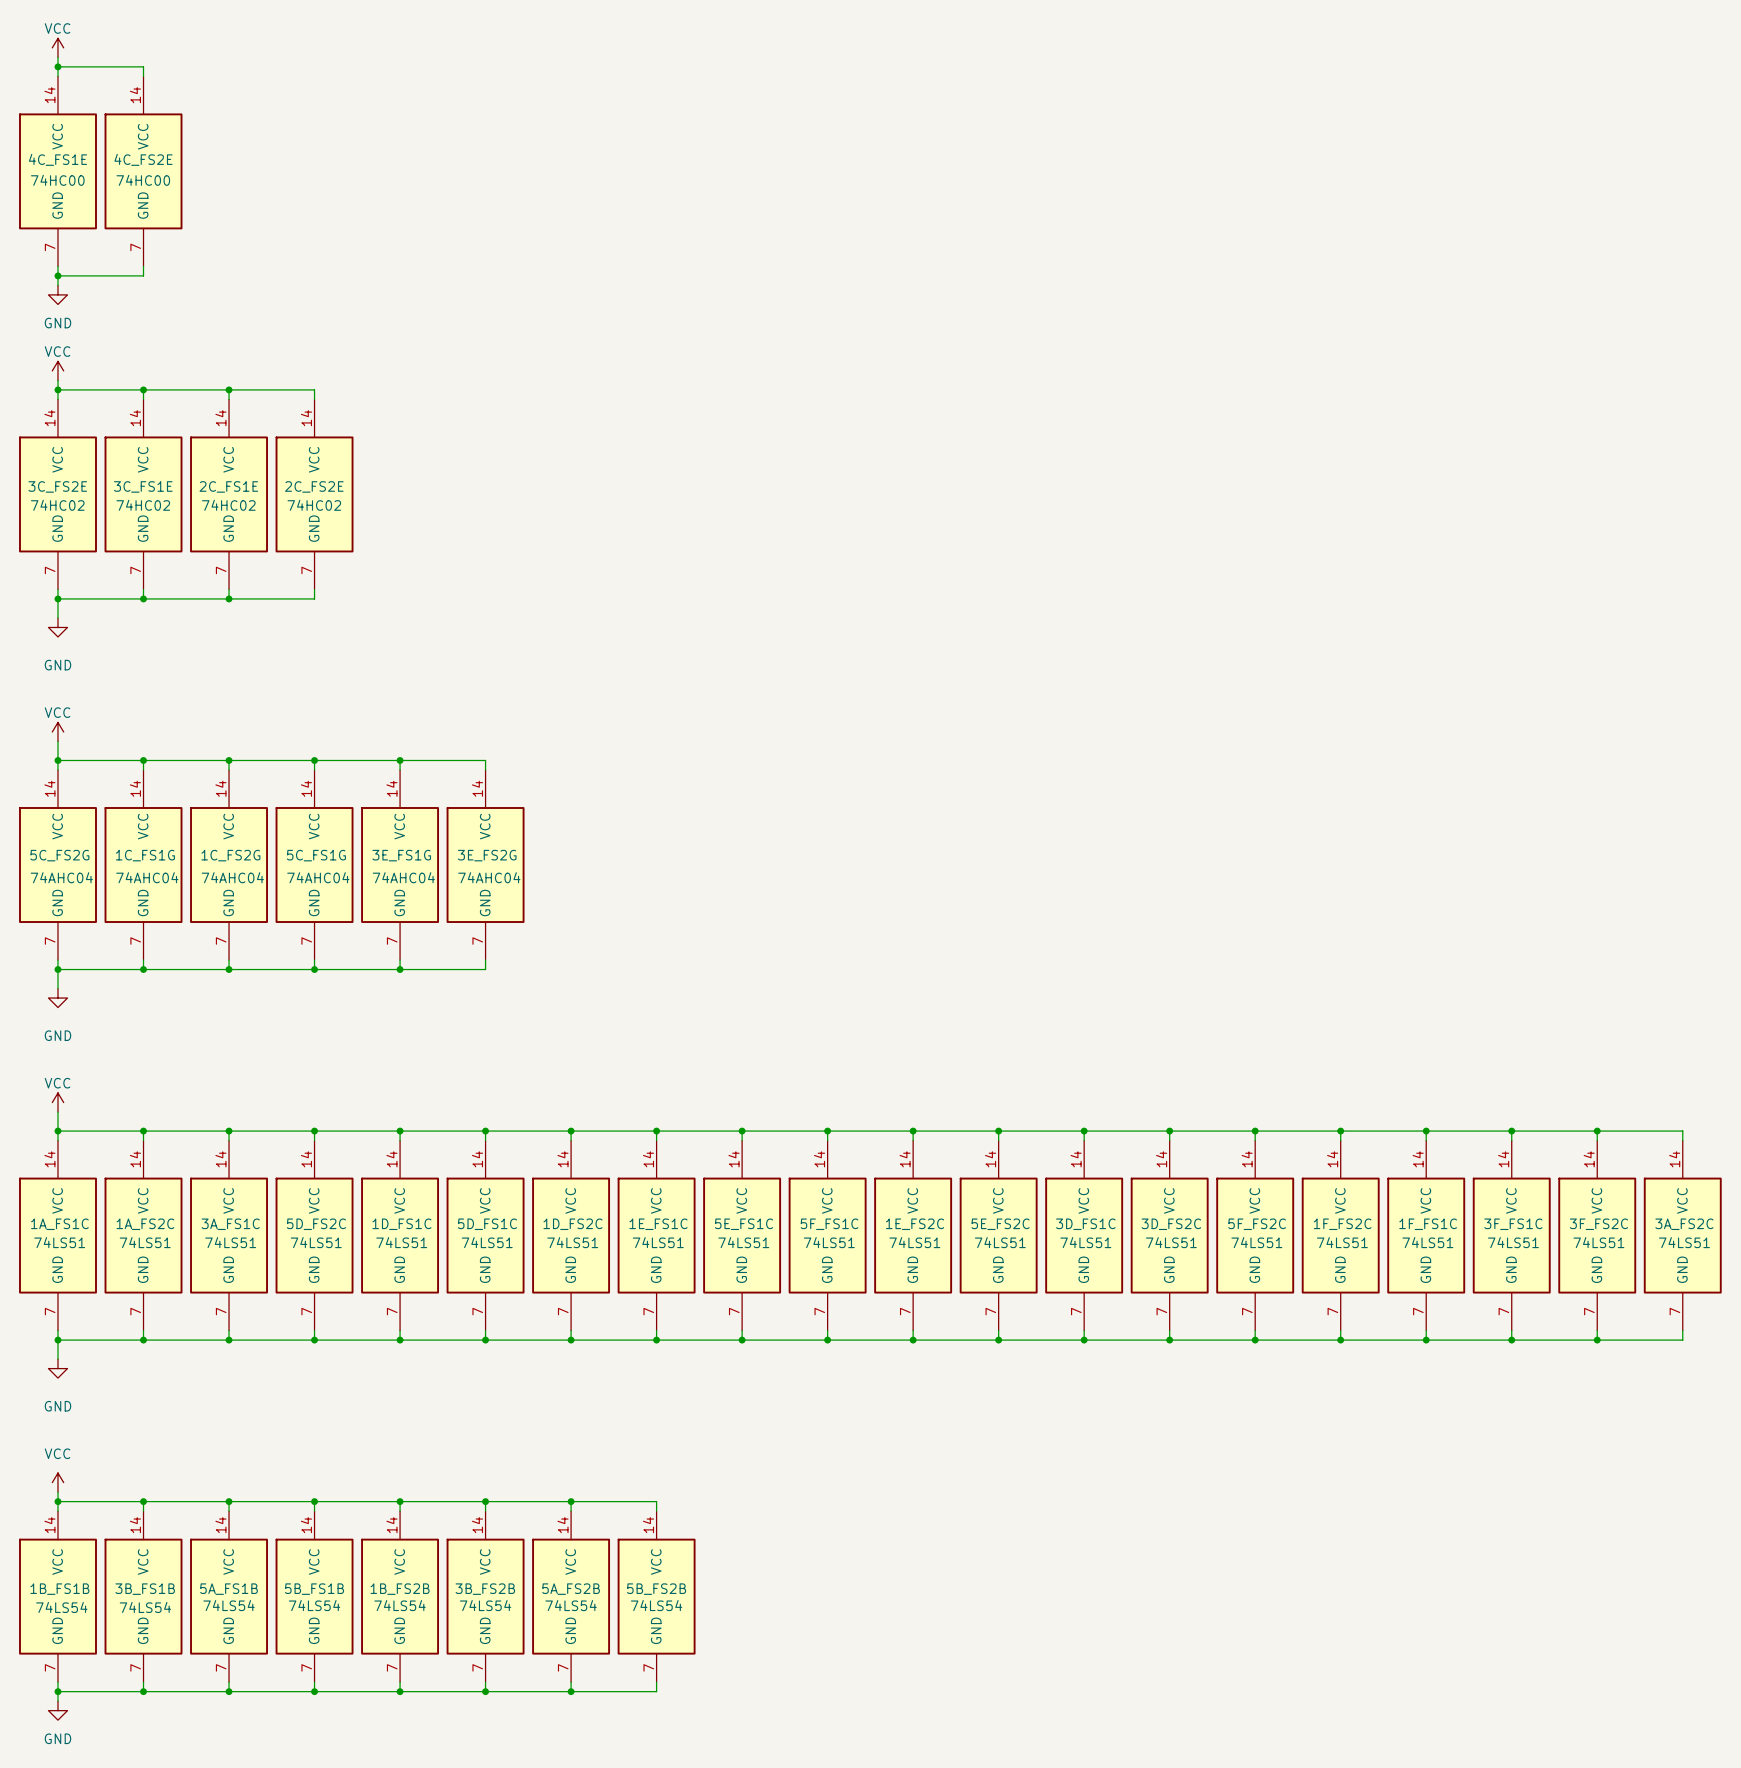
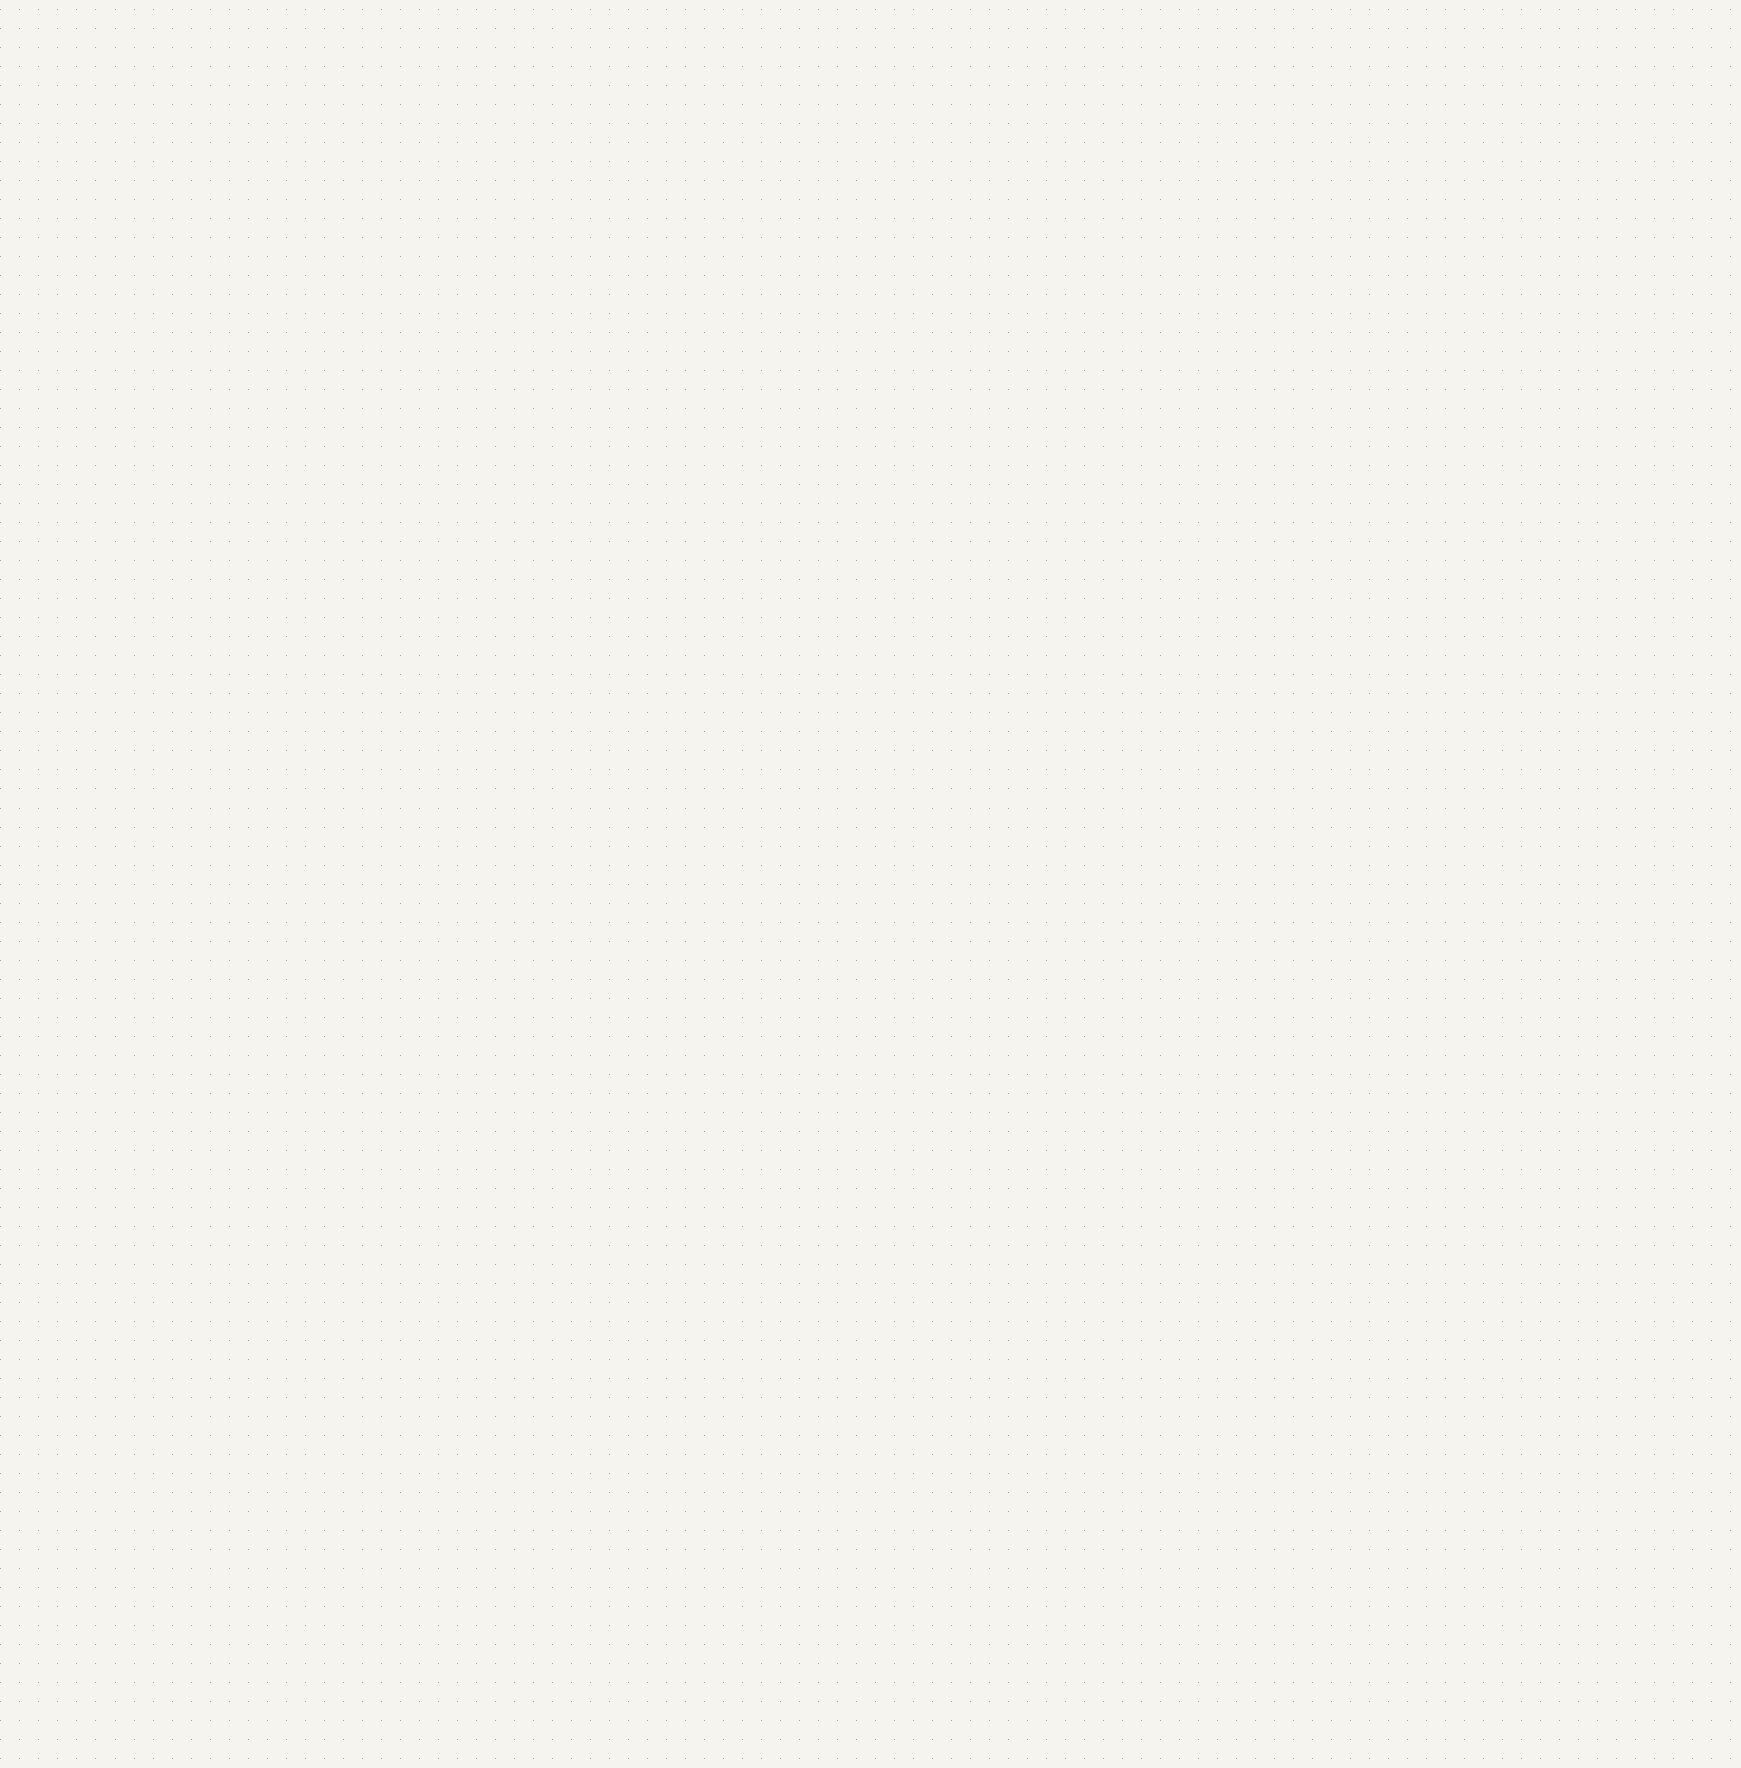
power symbol: VCC (57, 47) -> none
wire: (57, 57) (57, 76) -> none
wire: (57, 66) (143, 66) (143, 76) -> none
junction: (57, 66) -> none
4C_FS1E: 74HC00 (57, 171) -> none
4C_FS2E: 74HC00 (143, 171) -> none
wire: (57, 266) (57, 285) -> none
wire: (143, 266) (143, 275) (57, 275) -> none
junction: (57, 275) -> none
power symbol: GND (57, 294) -> none
power symbol: VCC (57, 370) -> none
wire: (57, 380) (57, 399) -> none
wire: (57, 389) (314, 389) (314, 399) -> none
junction: (57, 389) -> none
wire: (143, 389) (143, 399) -> none
junction: (143, 389) -> none
wire: (229, 389) (229, 399) -> none
junction: (229, 389) -> none
3C_FS2E: 74HC02 (57, 494) -> none
3C_FS1E: 74HC02 (143, 494) -> none
2C_FS1E: 74HC02 (229, 494) -> none
2C_FS2E: 74HC02 (314, 494) -> none
wire: (57, 589) (57, 617) -> none
wire: (143, 589) (143, 598) -> none
wire: (229, 589) (229, 598) -> none
wire: (314, 589) (314, 598) (57, 598) -> none
junction: (57, 598) -> none
junction: (143, 598) -> none
junction: (229, 598) -> none
power symbol: GND (57, 627) -> none
power symbol: VCC (57, 731) -> none
wire: (57, 741) (57, 769) -> none
wire: (57, 760) (485, 760) (485, 769) -> none
junction: (57, 760) -> none
wire: (143, 760) (143, 769) -> none
junction: (143, 760) -> none
wire: (229, 760) (229, 769) -> none
junction: (229, 760) -> none
wire: (314, 760) (314, 769) -> none
junction: (314, 760) -> none
wire: (400, 760) (400, 769) -> none
junction: (400, 760) -> none
5C_FS2G: 74AHC04 (57, 865) -> none
1C_FS1G: 74AHC04 (143, 865) -> none
1C_FS2G: 74AHC04 (229, 865) -> none
5C_FS1G: 74AHC04 (314, 865) -> none
3E_FS1G: 74AHC04 (400, 865) -> none
3E_FS2G: 74AHC04 (485, 865) -> none
wire: (57, 960) (57, 988) -> none
wire: (143, 960) (143, 969) -> none
wire: (229, 960) (229, 969) -> none
wire: (314, 960) (314, 969) -> none
wire: (400, 960) (400, 969) -> none
wire: (485, 960) (485, 969) (57, 969) -> none
junction: (57, 969) -> none
junction: (143, 969) -> none
junction: (229, 969) -> none
junction: (314, 969) -> none
junction: (400, 969) -> none
power symbol: GND (57, 998) -> none
power symbol: VCC (57, 1102) -> none
wire: (57, 1112) (57, 1140) -> none
wire: (57, 1131) (1682, 1131) (1682, 1140) -> none
junction: (57, 1131) -> none
wire: (143, 1131) (143, 1140) -> none
junction: (143, 1131) -> none
wire: (229, 1131) (229, 1140) -> none
junction: (229, 1131) -> none
wire: (314, 1131) (314, 1140) -> none
junction: (314, 1131) -> none
wire: (400, 1131) (400, 1140) -> none
junction: (400, 1131) -> none
wire: (485, 1131) (485, 1140) -> none
junction: (485, 1131) -> none
wire: (571, 1131) (571, 1140) -> none
junction: (571, 1131) -> none
wire: (656, 1131) (656, 1140) -> none
junction: (656, 1131) -> none
wire: (742, 1131) (742, 1140) -> none
junction: (742, 1131) -> none
wire: (827, 1131) (827, 1140) -> none
junction: (827, 1131) -> none
wire: (913, 1131) (913, 1140) -> none
junction: (913, 1131) -> none
wire: (998, 1131) (998, 1140) -> none
junction: (998, 1131) -> none
wire: (1084, 1131) (1084, 1140) -> none
junction: (1084, 1131) -> none
wire: (1169, 1131) (1169, 1140) -> none
junction: (1169, 1131) -> none
wire: (1255, 1131) (1255, 1140) -> none
junction: (1255, 1131) -> none
wire: (1340, 1131) (1340, 1140) -> none
junction: (1340, 1131) -> none
wire: (1426, 1131) (1426, 1140) -> none
junction: (1426, 1131) -> none
wire: (1511, 1131) (1511, 1140) -> none
junction: (1511, 1131) -> none
wire: (1597, 1131) (1597, 1140) -> none
junction: (1597, 1131) -> none
1A_FS1C: 74LS51 (57, 1235) -> none
1A_FS2C: 74LS51 (143, 1235) -> none
3A_FS1C: 74LS51 (229, 1235) -> none
5D_FS2C: 74LS51 (314, 1235) -> none
1D_FS1C: 74LS51 (400, 1235) -> none
5D_FS1C: 74LS51 (485, 1235) -> none
1D_FS2C: 74LS51 (571, 1235) -> none
1E_FS1C: 74LS51 (656, 1235) -> none
5E_FS1C: 74LS51 (742, 1235) -> none
5F_FS1C: 74LS51 (827, 1235) -> none
1E_FS2C: 74LS51 (913, 1235) -> none
5E_FS2C: 74LS51 (998, 1235) -> none
3D_FS1C: 74LS51 (1084, 1235) -> none
3D_FS2C: 74LS51 (1169, 1235) -> none
5F_FS2C: 74LS51 (1255, 1235) -> none
1F_FS2C: 74LS51 (1340, 1235) -> none
1F_FS1C: 74LS51 (1426, 1235) -> none
3F_FS1C: 74LS51 (1511, 1235) -> none
3F_FS2C: 74LS51 (1597, 1235) -> none
3A_FS2C: 74LS51 (1682, 1235) -> none
wire: (57, 1330) (57, 1359) -> none
wire: (143, 1330) (143, 1340) -> none
wire: (229, 1330) (229, 1340) -> none
wire: (314, 1330) (314, 1340) -> none
wire: (400, 1330) (400, 1340) -> none
wire: (485, 1330) (485, 1340) -> none
wire: (571, 1330) (571, 1340) -> none
wire: (656, 1330) (656, 1340) -> none
wire: (742, 1330) (742, 1340) -> none
wire: (827, 1330) (827, 1340) -> none
wire: (913, 1330) (913, 1340) -> none
wire: (998, 1330) (998, 1340) -> none
wire: (1084, 1330) (1084, 1340) -> none
wire: (1169, 1330) (1169, 1340) -> none
wire: (1255, 1330) (1255, 1340) -> none
wire: (1340, 1330) (1340, 1340) -> none
wire: (1426, 1330) (1426, 1340) -> none
wire: (1511, 1330) (1511, 1340) -> none
wire: (1597, 1330) (1597, 1340) -> none
wire: (1682, 1330) (1682, 1340) (57, 1340) -> none
junction: (57, 1340) -> none
junction: (143, 1340) -> none
junction: (229, 1340) -> none
junction: (314, 1340) -> none
junction: (400, 1340) -> none
junction: (485, 1340) -> none
junction: (571, 1340) -> none
junction: (656, 1340) -> none
junction: (742, 1340) -> none
junction: (827, 1340) -> none
junction: (913, 1340) -> none
junction: (998, 1340) -> none
junction: (1084, 1340) -> none
junction: (1169, 1340) -> none
junction: (1255, 1340) -> none
junction: (1340, 1340) -> none
junction: (1426, 1340) -> none
junction: (1511, 1340) -> none
junction: (1597, 1340) -> none
power symbol: GND (57, 1368) -> none
power symbol: VCC (57, 1482) -> none
wire: (57, 1492) (57, 1511) -> none
wire: (57, 1501) (656, 1501) (656, 1511) -> none
junction: (57, 1501) -> none
wire: (143, 1501) (143, 1511) -> none
junction: (143, 1501) -> none
wire: (229, 1501) (229, 1511) -> none
junction: (229, 1501) -> none
wire: (314, 1501) (314, 1511) -> none
junction: (314, 1501) -> none
wire: (400, 1501) (400, 1511) -> none
junction: (400, 1501) -> none
wire: (485, 1501) (485, 1511) -> none
junction: (485, 1501) -> none
wire: (571, 1501) (571, 1511) -> none
junction: (571, 1501) -> none
1B_FS1B: 74LS54 (57, 1596) -> none
3B_FS1B: 74LS54 (143, 1596) -> none
5A_FS1B: 74LS54 (229, 1596) -> none
5B_FS1B: 74LS54 (314, 1596) -> none
1B_FS2B: 74LS54 (400, 1596) -> none
3B_FS2B: 74LS54 (485, 1596) -> none
5A_FS2B: 74LS54 (571, 1596) -> none
5B_FS2B: 74LS54 (656, 1596) -> none
wire: (57, 1682) (57, 1701) -> none
wire: (143, 1682) (143, 1691) -> none
wire: (229, 1682) (229, 1691) -> none
wire: (314, 1682) (314, 1691) -> none
wire: (400, 1682) (400, 1691) -> none
wire: (485, 1682) (485, 1691) -> none
wire: (571, 1682) (571, 1691) -> none
wire: (656, 1682) (656, 1691) (57, 1691) -> none
junction: (57, 1691) -> none
junction: (143, 1691) -> none
junction: (229, 1691) -> none
junction: (314, 1691) -> none
junction: (400, 1691) -> none
junction: (485, 1691) -> none
junction: (571, 1691) -> none
power symbol: GND (57, 1710) -> none

